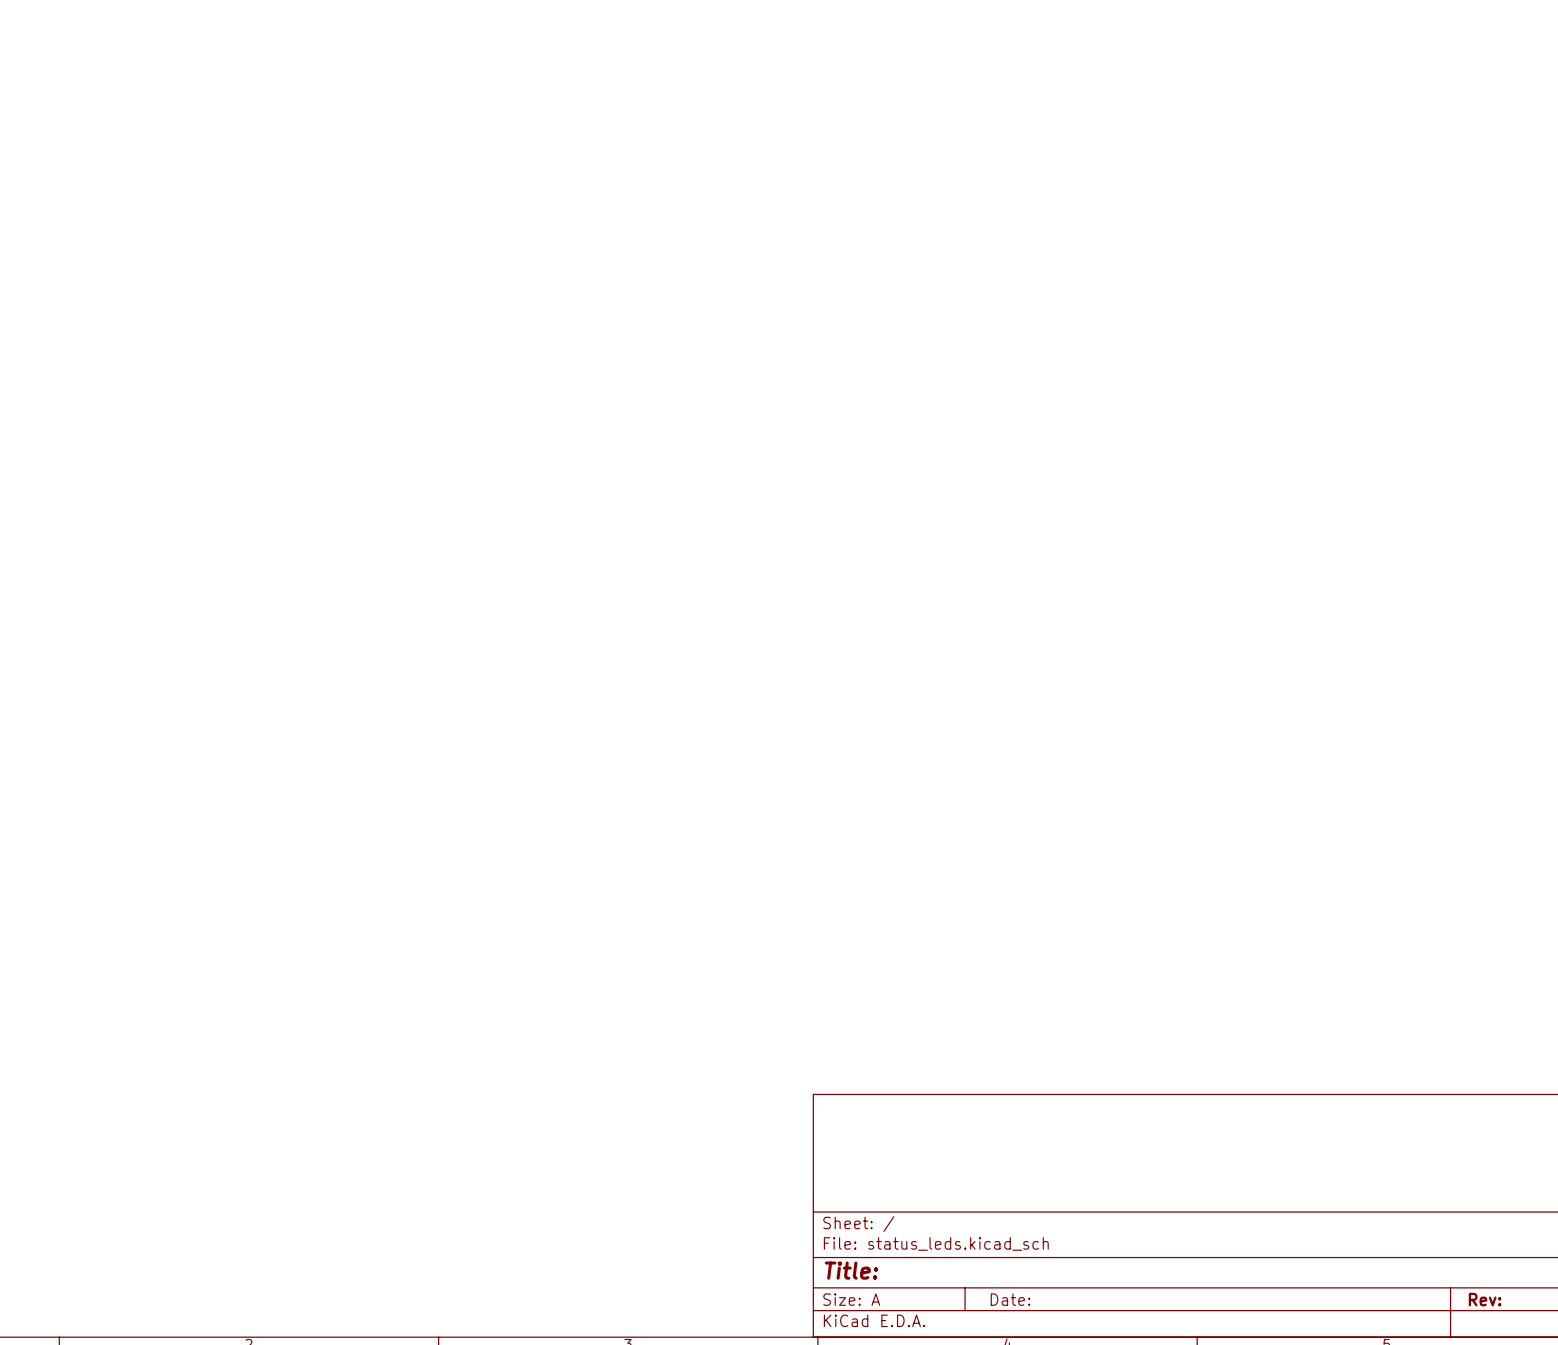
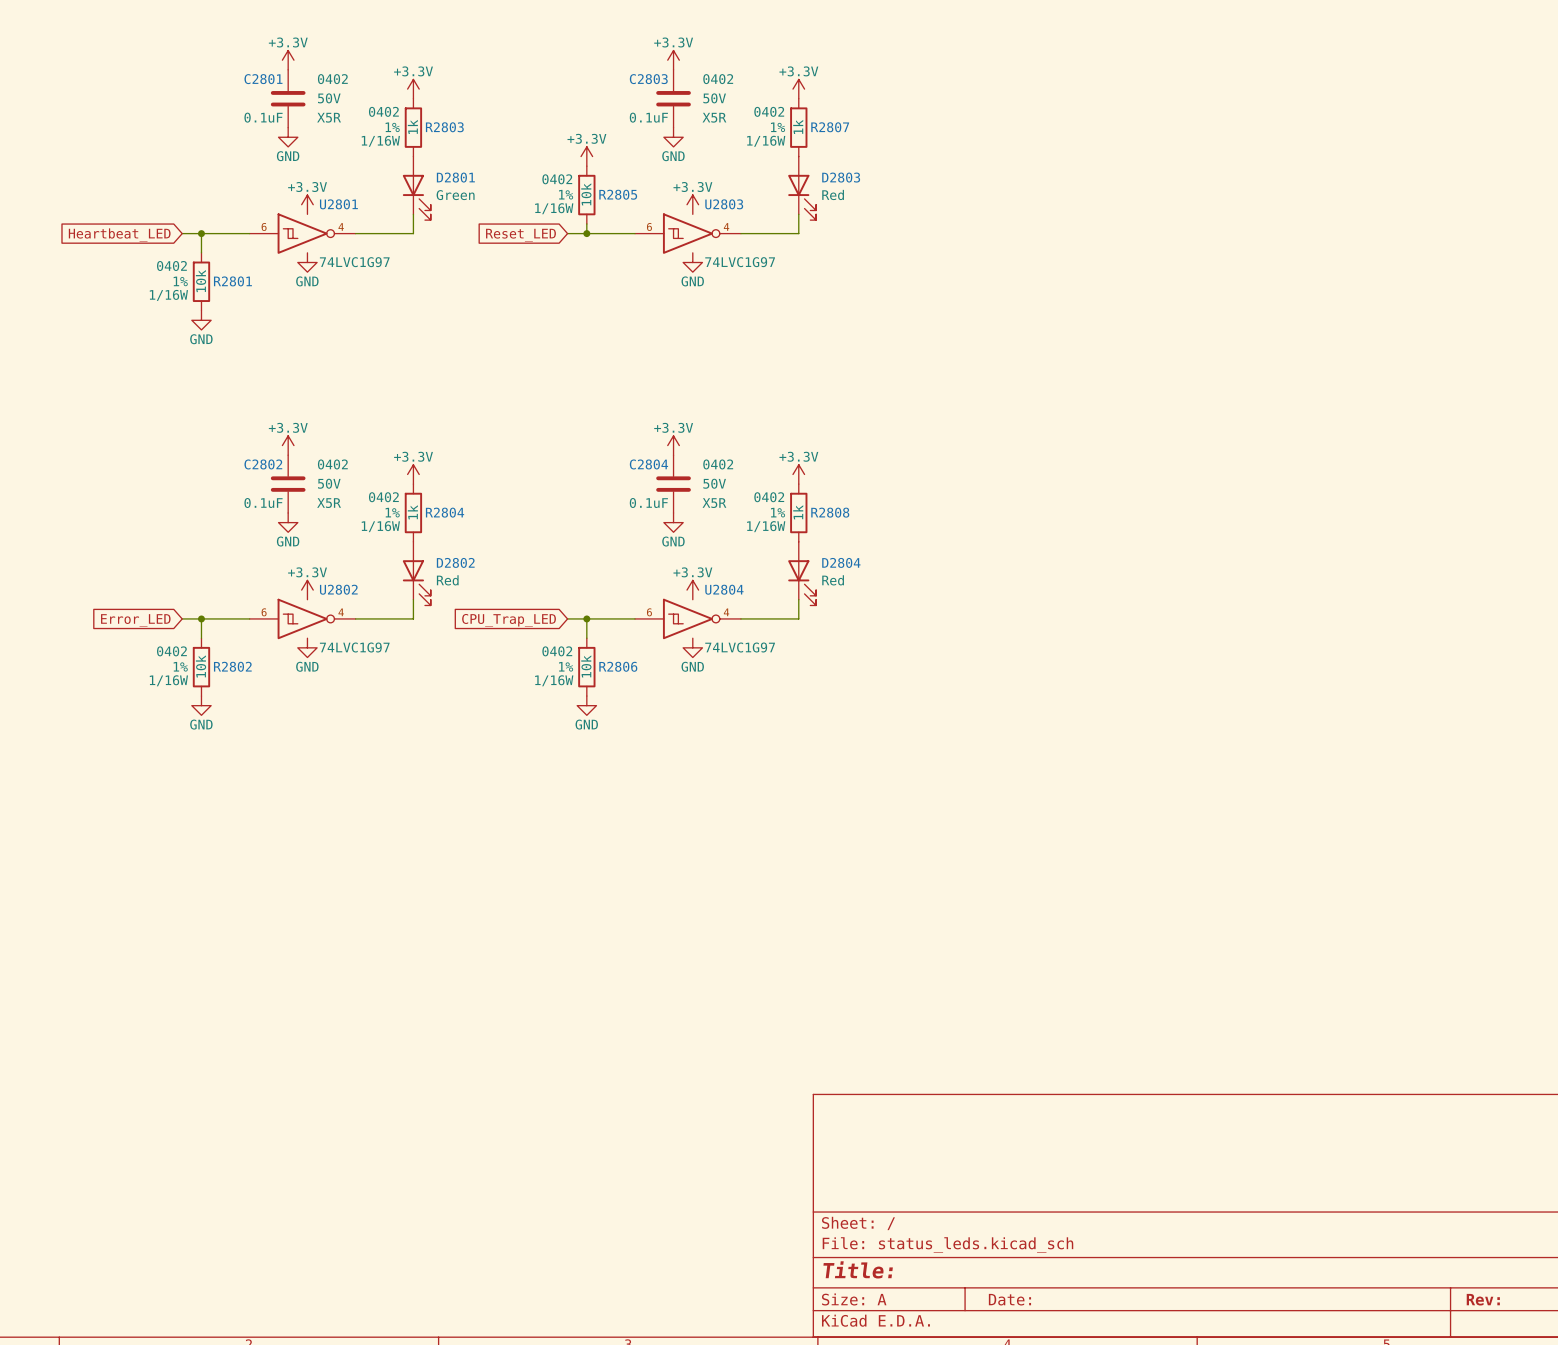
power symbol: none -> +3.3V (288, 60)
power symbol: none -> +3.3V (673, 60)
power symbol: none -> +3.3V (413, 89)
power symbol: none -> +3.3V (798, 89)
C2801: none -> 0.1uF (288, 98)
C2803: none -> 0.1uF (673, 98)
R2803: none -> 1k (413, 127)
R2807: none -> 1k (798, 127)
power symbol: none -> GND (288, 137)
power symbol: none -> GND (673, 137)
power symbol: none -> +3.3V (586, 156)
D2801: none -> Green (416, 188)
D2803: none -> Red (802, 188)
R2805: none -> 10k (586, 195)
power symbol: none -> +3.3V (307, 204)
power symbol: none -> +3.3V (692, 204)
wire: none -> (413, 214) (413, 233) (355, 233)
wire: none -> (798, 214) (798, 233) (740, 233)
wire: none -> (586, 223) (586, 233)
wire: none -> (182, 233) (249, 233)
wire: none -> (201, 233) (201, 252)
junction: none -> (201, 233)
U2801: none -> 74LVC1G97 (302, 233)
wire: none -> (567, 233) (635, 233)
junction: none -> (586, 233)
U2803: none -> 74LVC1G97 (687, 233)
global label: none -> Heartbeat_LED (119, 234)
global label: none -> Reset_LED (520, 235)
power symbol: none -> GND (307, 262)
power symbol: none -> GND (692, 262)
R2801: none -> 10k (201, 281)
power symbol: none -> GND (201, 320)
power symbol: none -> +3.3V (288, 445)
power symbol: none -> +3.3V (673, 445)
power symbol: none -> +3.3V (413, 474)
power symbol: none -> +3.3V (798, 474)
C2802: none -> 0.1uF (288, 484)
C2804: none -> 0.1uF (673, 484)
R2804: none -> 1k (413, 512)
R2808: none -> 1k (798, 512)
power symbol: none -> GND (288, 522)
power symbol: none -> GND (673, 522)
D2802: none -> Red (416, 573)
D2804: none -> Red (802, 573)
power symbol: none -> +3.3V (307, 590)
power symbol: none -> +3.3V (692, 590)
wire: none -> (413, 599) (413, 618) (355, 618)
wire: none -> (798, 599) (798, 618) (740, 618)
wire: none -> (182, 618) (249, 618)
wire: none -> (201, 618) (201, 638)
junction: none -> (201, 618)
U2802: none -> 74LVC1G97 (302, 618)
wire: none -> (567, 618) (635, 618)
wire: none -> (586, 618) (586, 638)
junction: none -> (586, 618)
U2804: none -> 74LVC1G97 (687, 618)
global label: none -> Error_LED (135, 620)
global label: none -> CPU_Trap_LED (509, 620)
power symbol: none -> GND (307, 647)
power symbol: none -> GND (692, 647)
R2802: none -> 10k (201, 667)
R2806: none -> 10k (586, 667)
power symbol: none -> GND (201, 705)
power symbol: none -> GND (586, 705)

